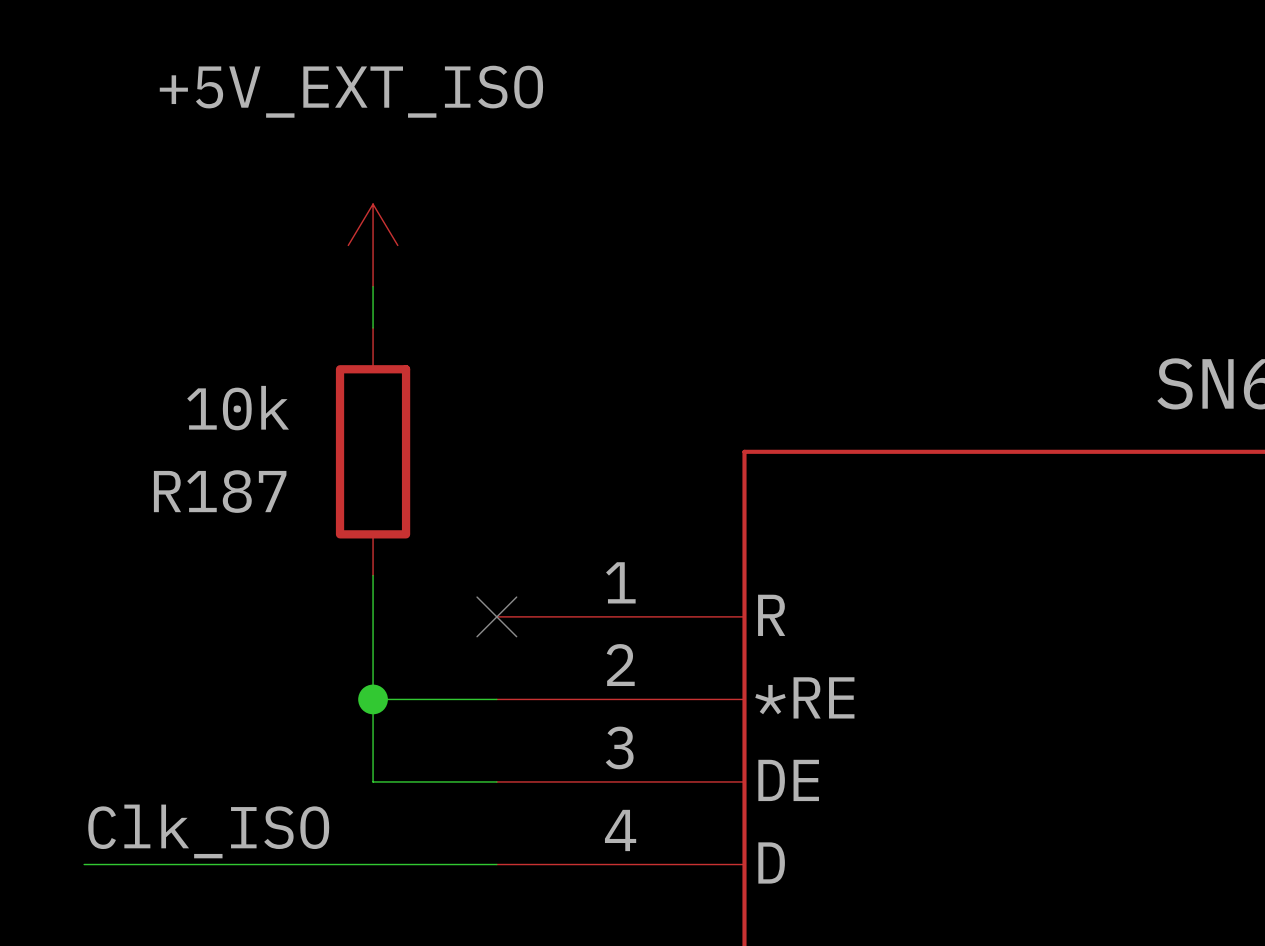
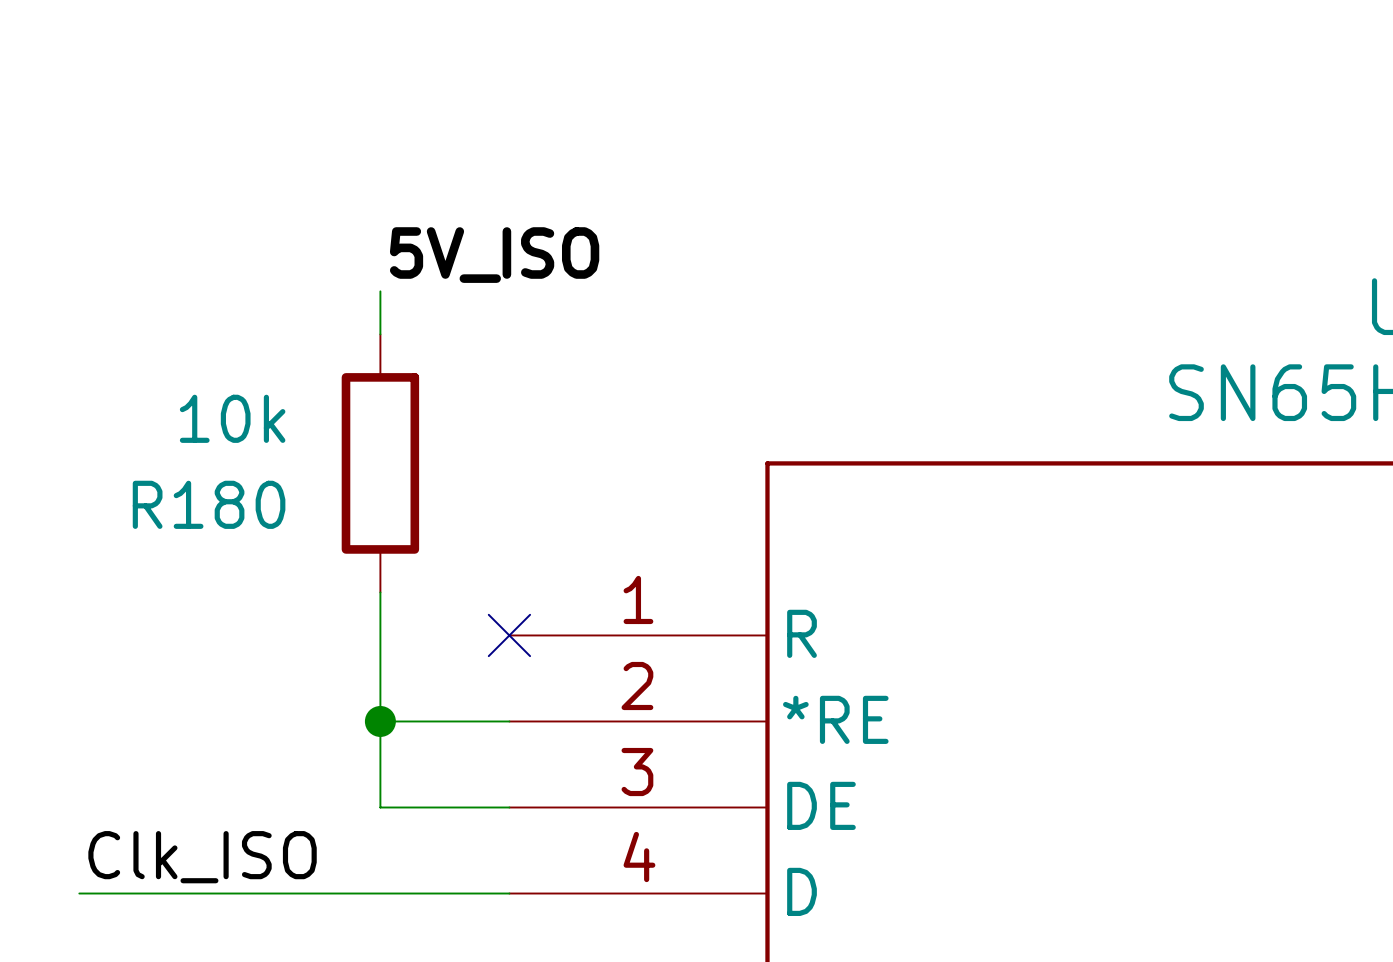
power symbol: +5V_EXT_ISO (373, 245) -> none
label: none -> 5V_ISO (494, 255)
R187 name: R187 (220, 491) -> R180 (209, 504)

